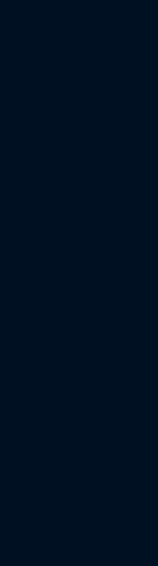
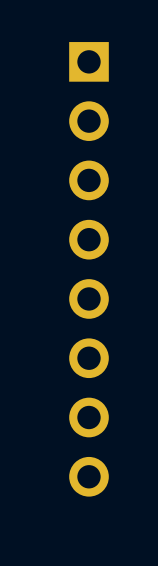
part: none -> (88, 269)

